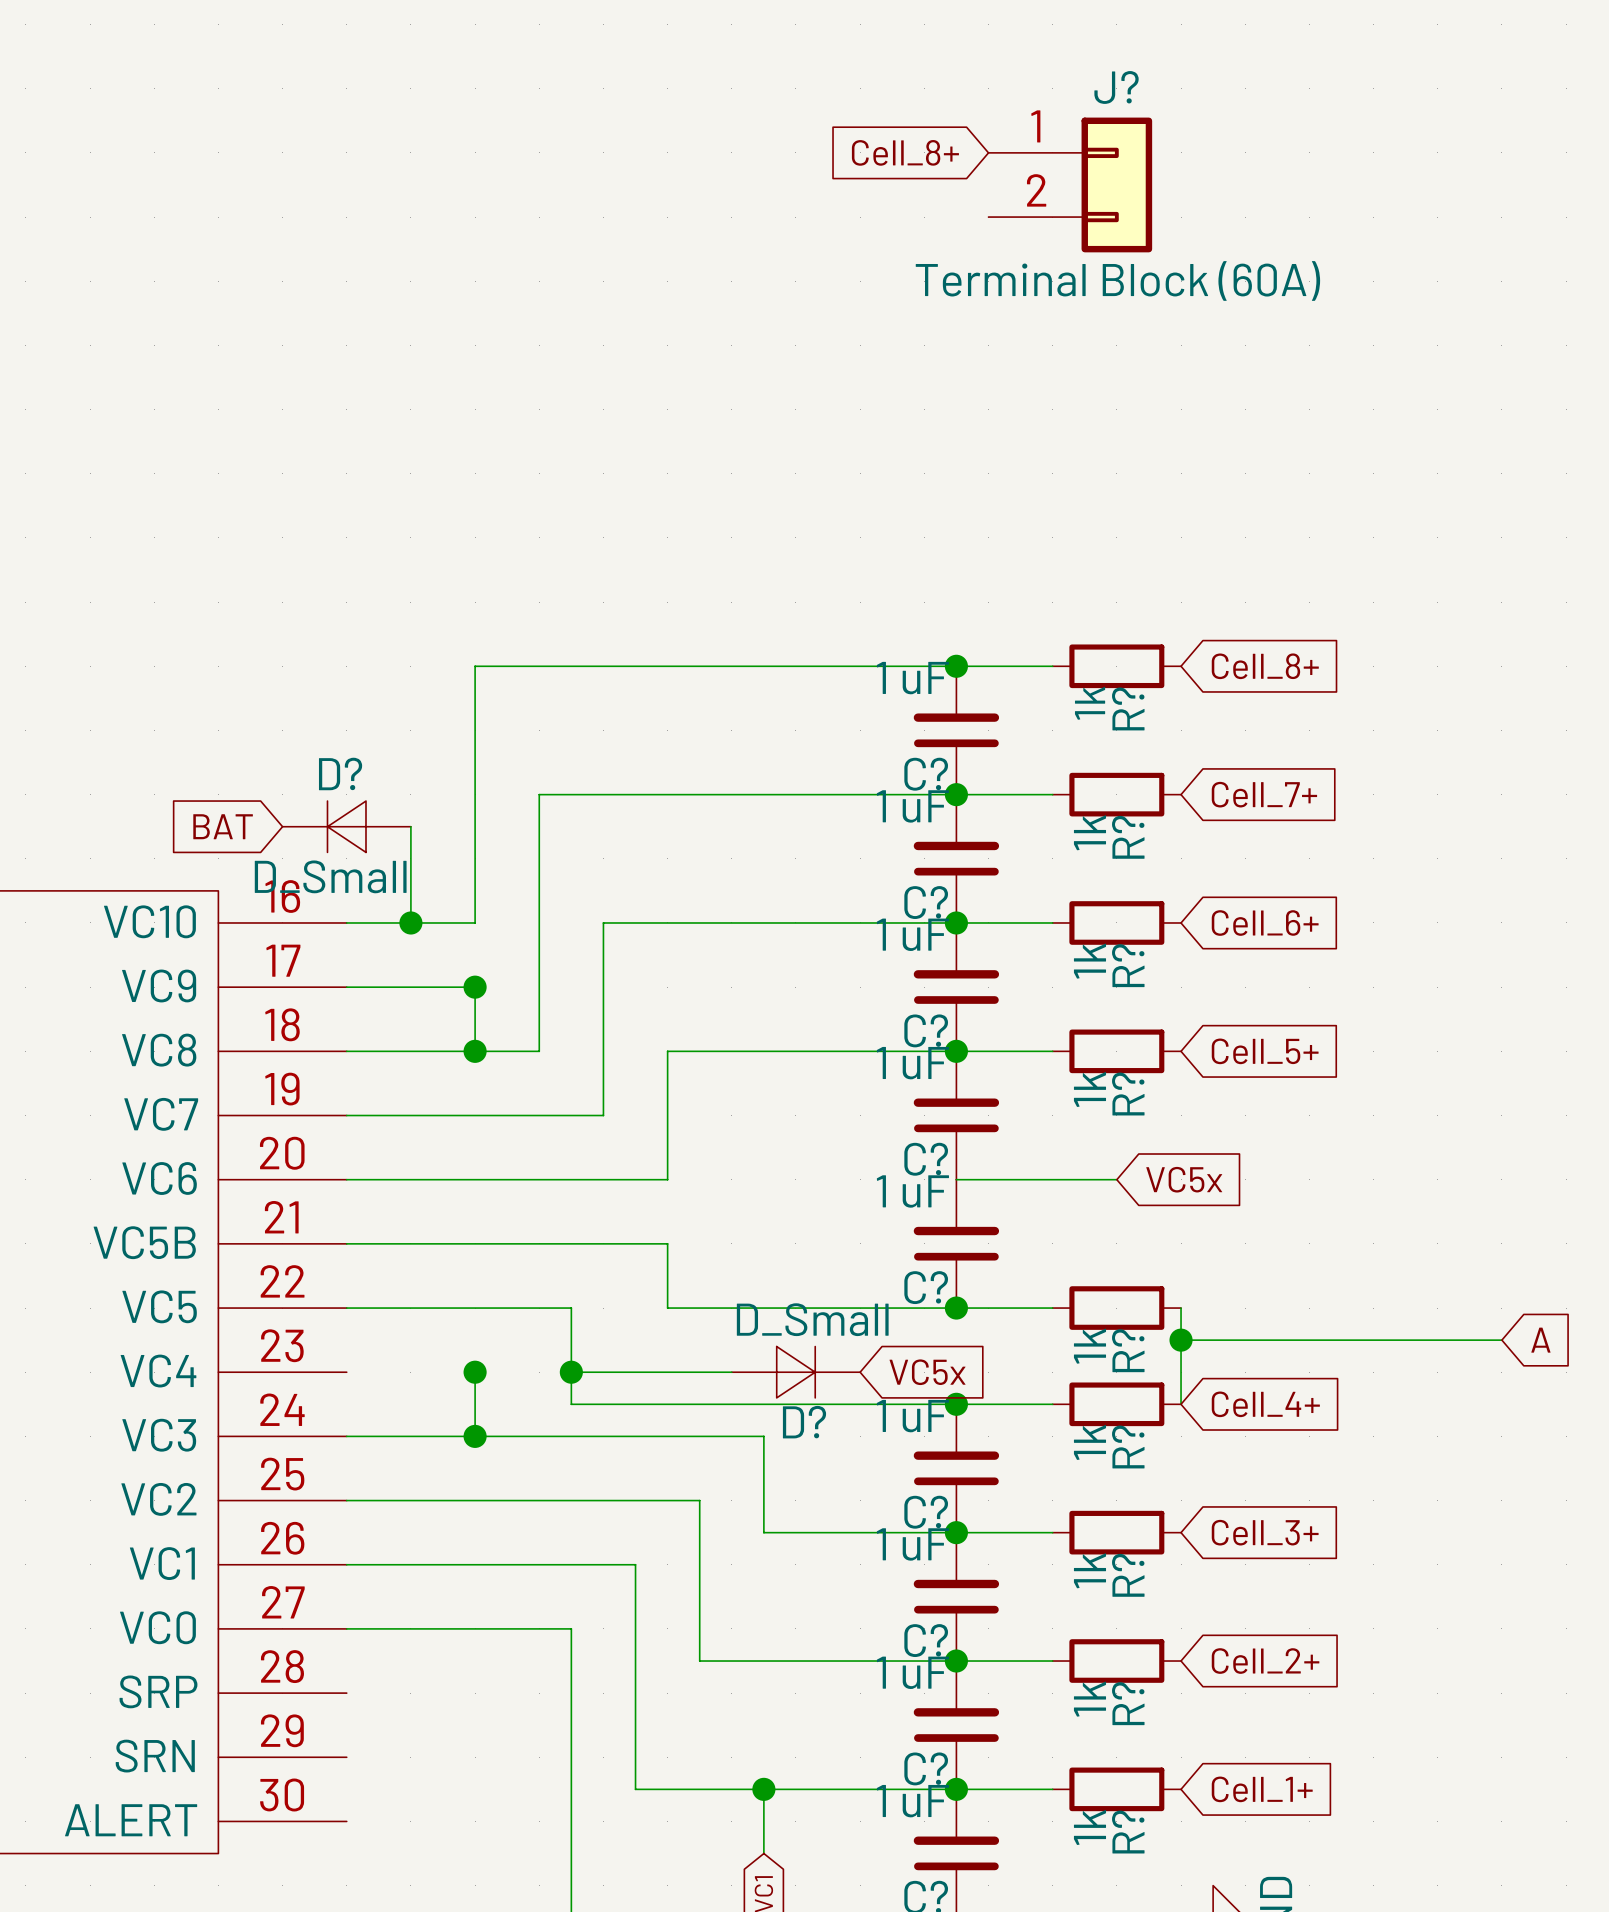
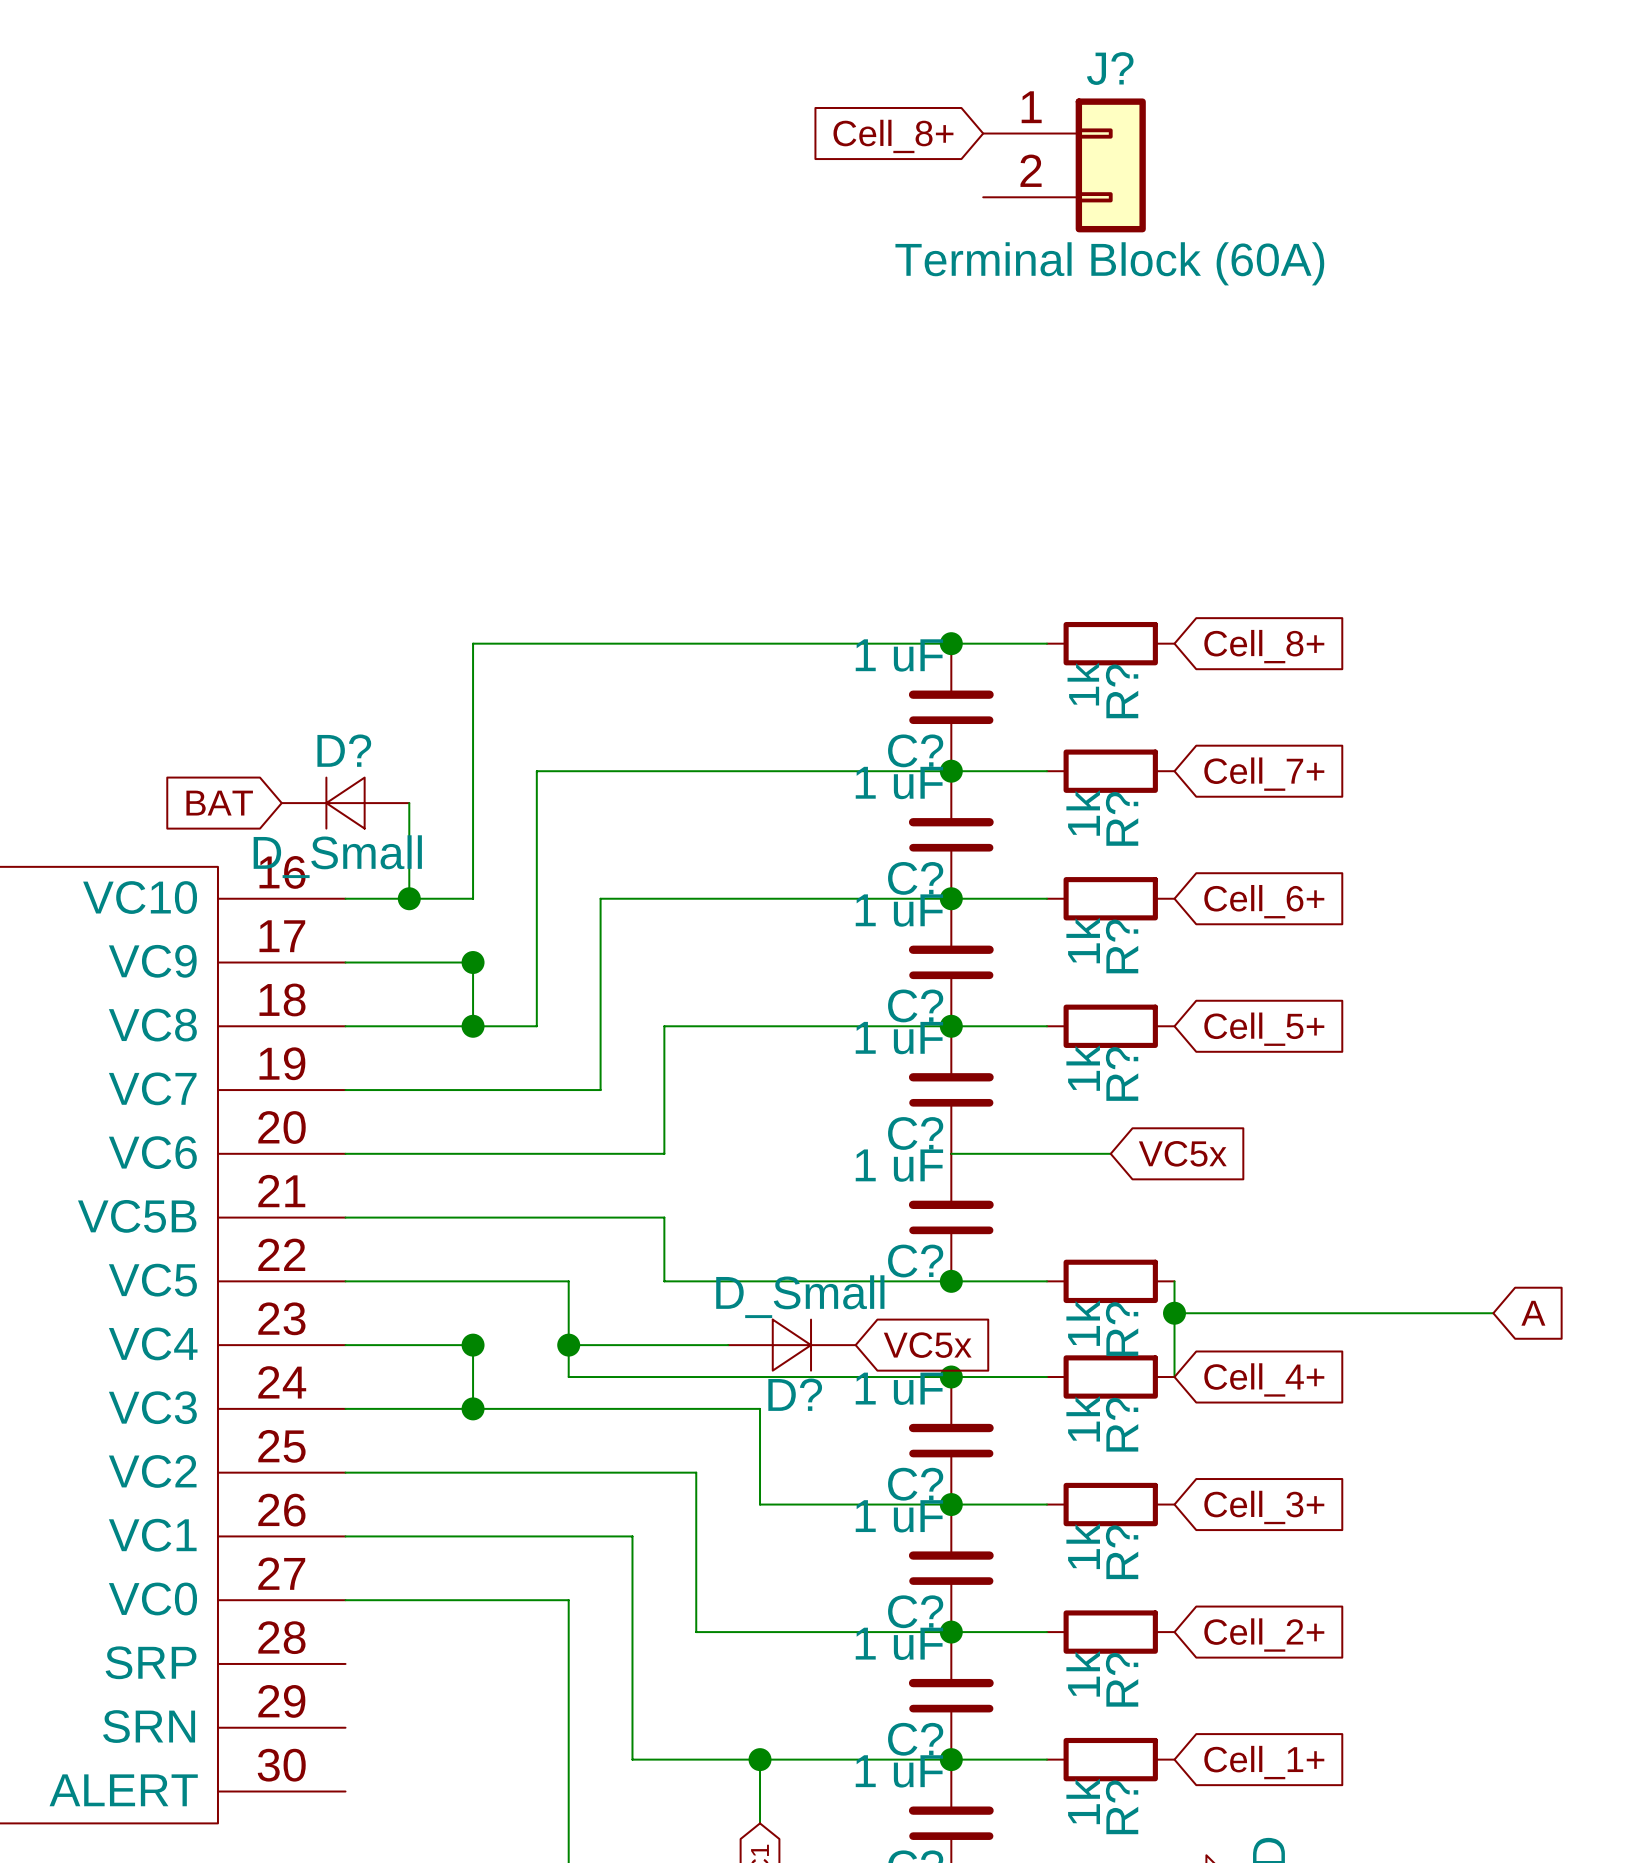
wire: none -> (345, 1345) (473, 1345)

